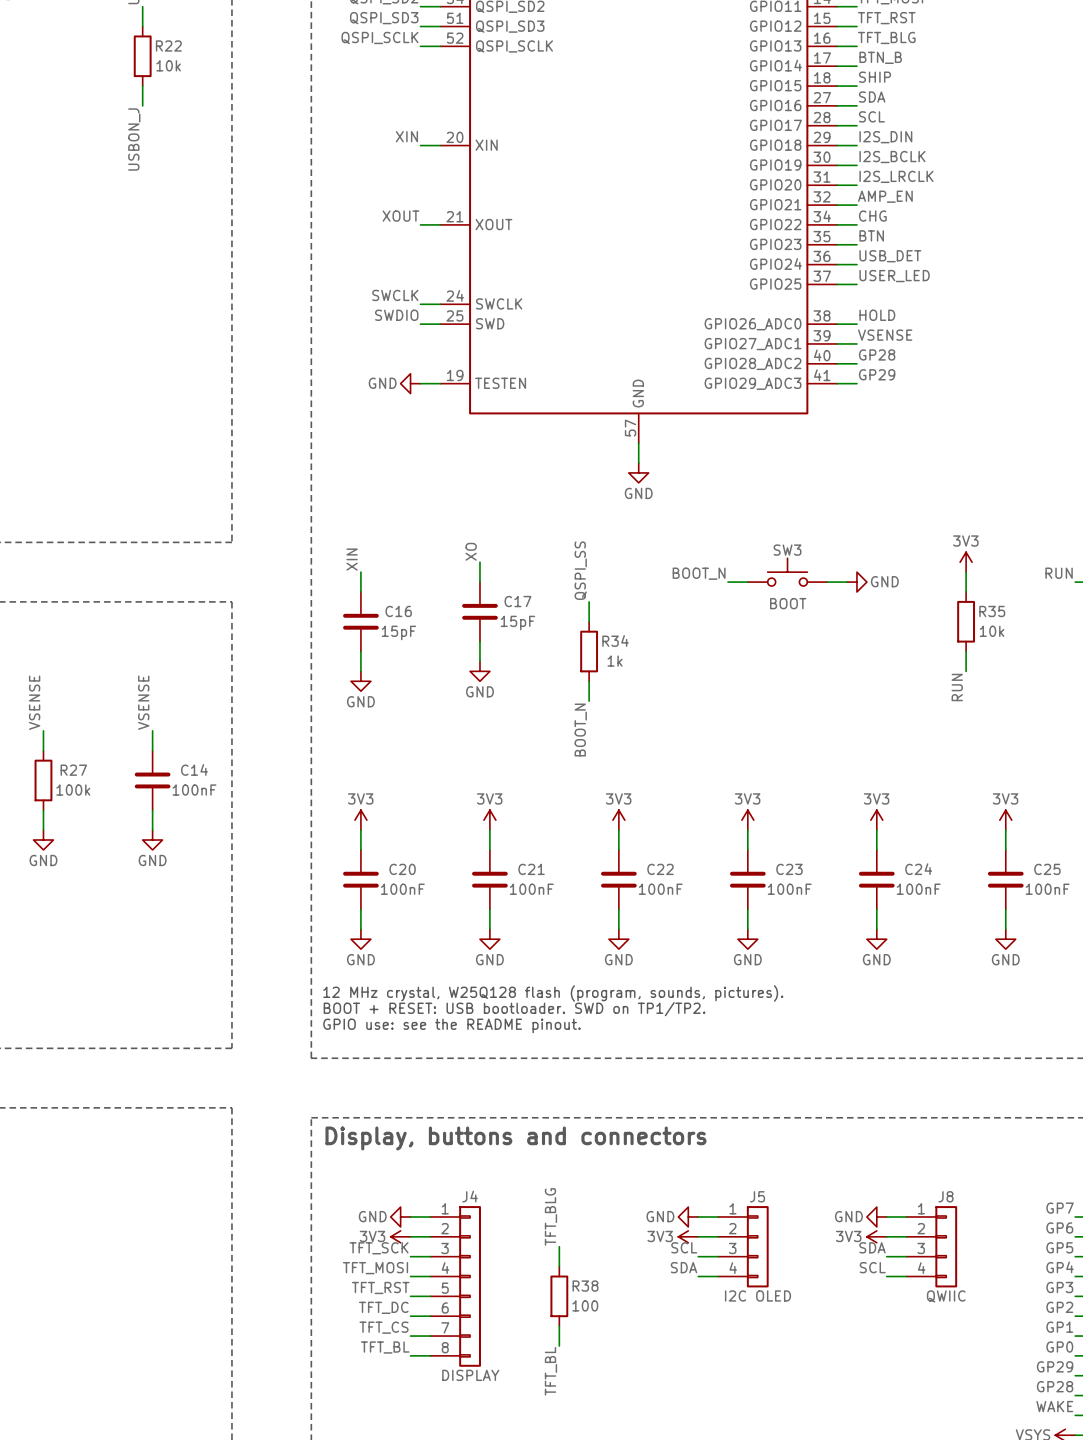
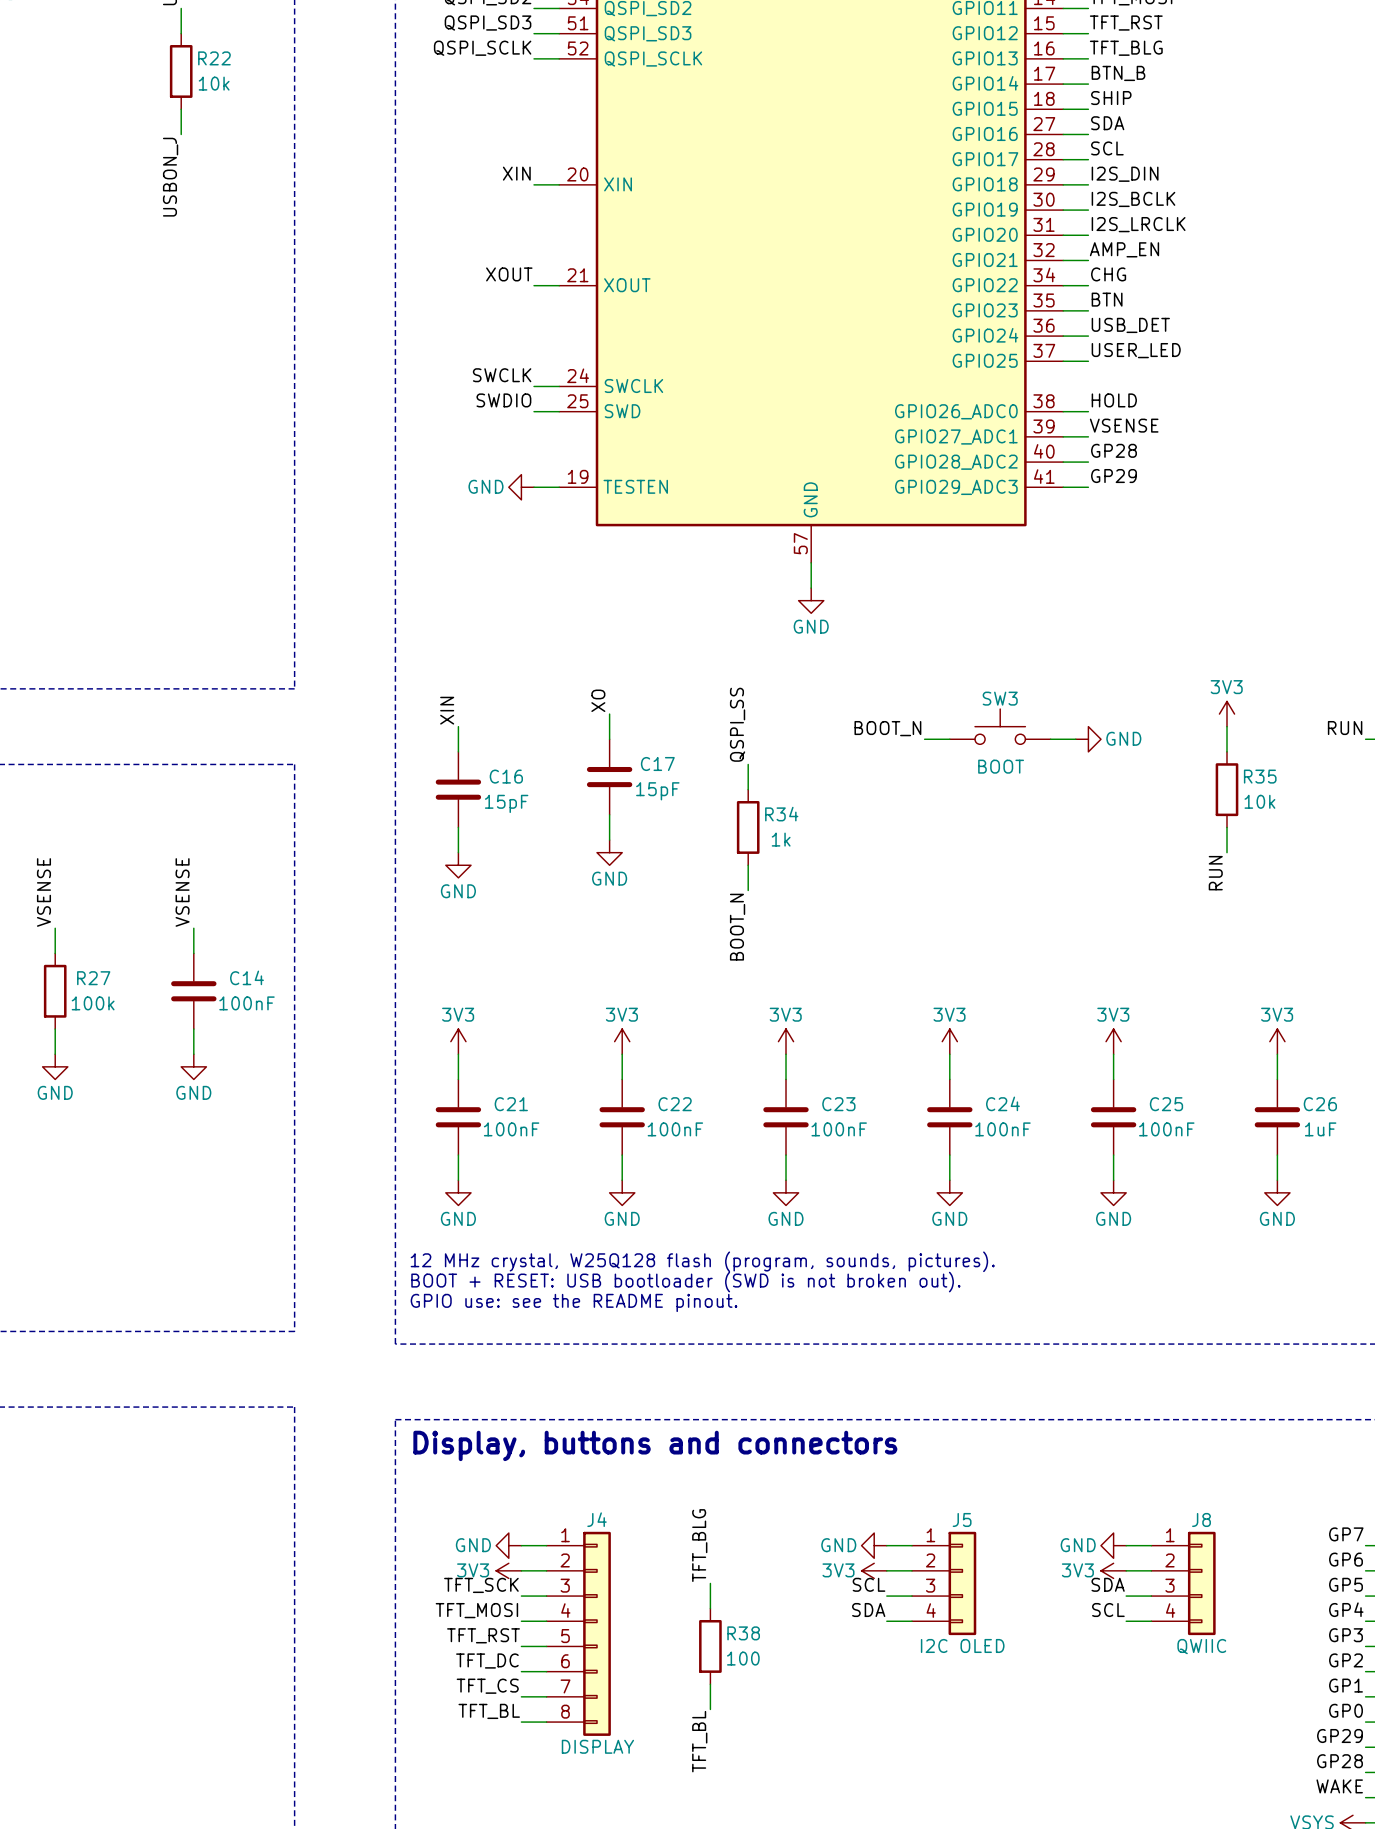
C20 name: C20 (402, 869) -> C21 (511, 1104)
C21 name: C21 (531, 869) -> C22 (675, 1104)
C22 name: C22 (660, 869) -> C23 (838, 1104)
C23 name: C23 (789, 869) -> C24 (1002, 1103)
C24 name: C24 (918, 869) -> C25 (1166, 1104)
C25 name: C25 (1047, 869) -> C26 (1320, 1104)
C25 value: 100nF (1047, 889) -> 1uF (1320, 1129)
text: BOOT + RESET: USB bootloader. SWD on TP1/TP2. (514, 1009) -> BOOT + RESET: USB bootloader (SWD is not broken out). (685, 1282)

